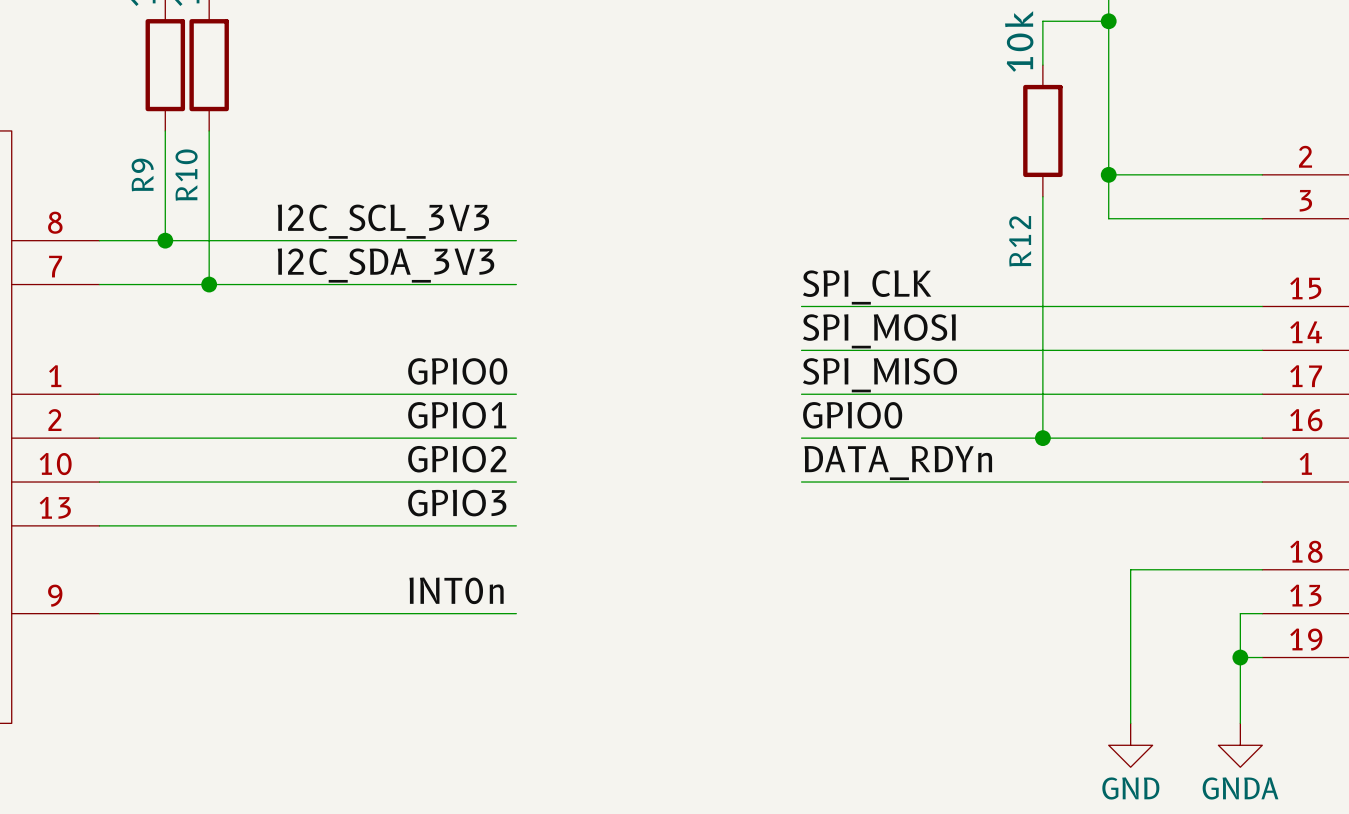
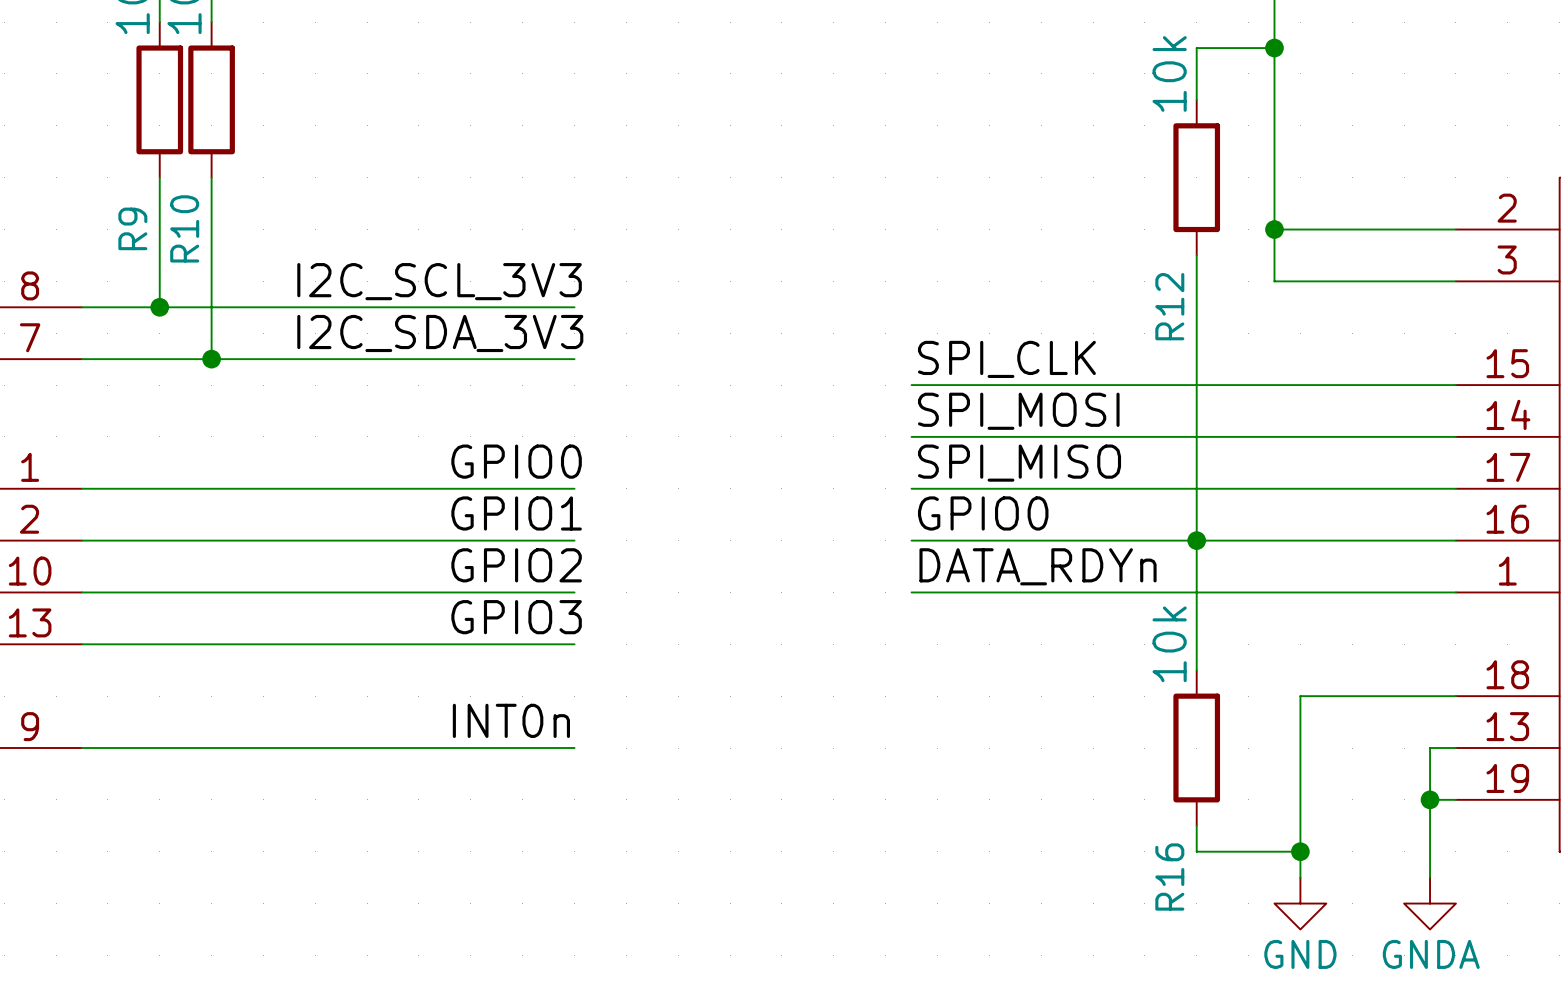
wire: none -> (1196, 540) (1196, 670)
R16: none -> (1196, 748)
wire: none -> (1196, 825) (1196, 851) (1300, 851)
junction: none -> (1300, 851)

